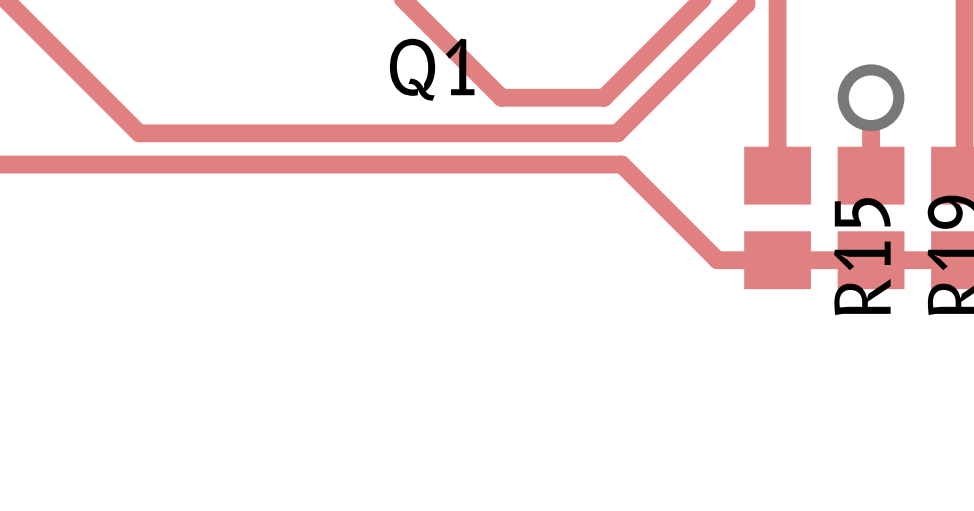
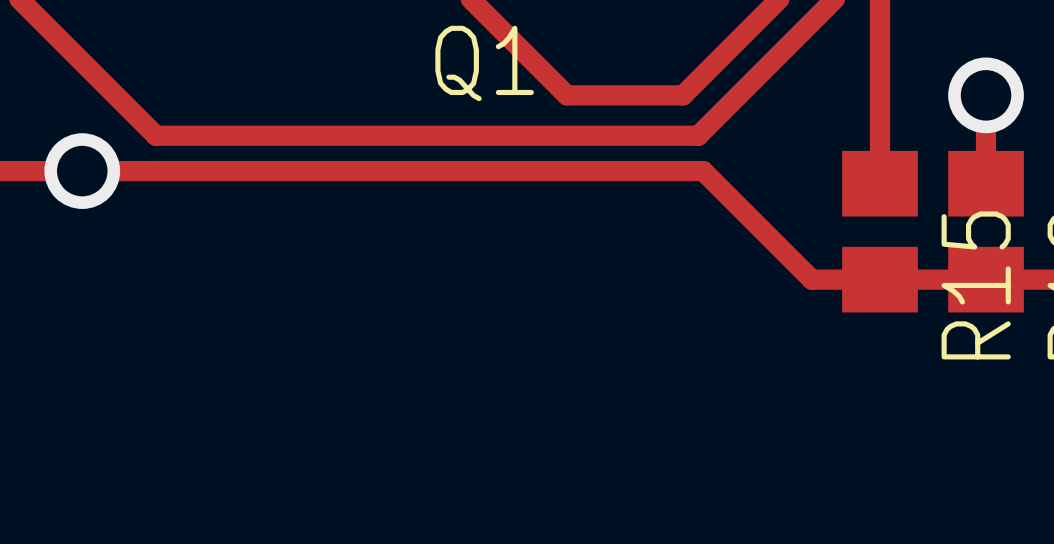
via: none -> (82, 171)

